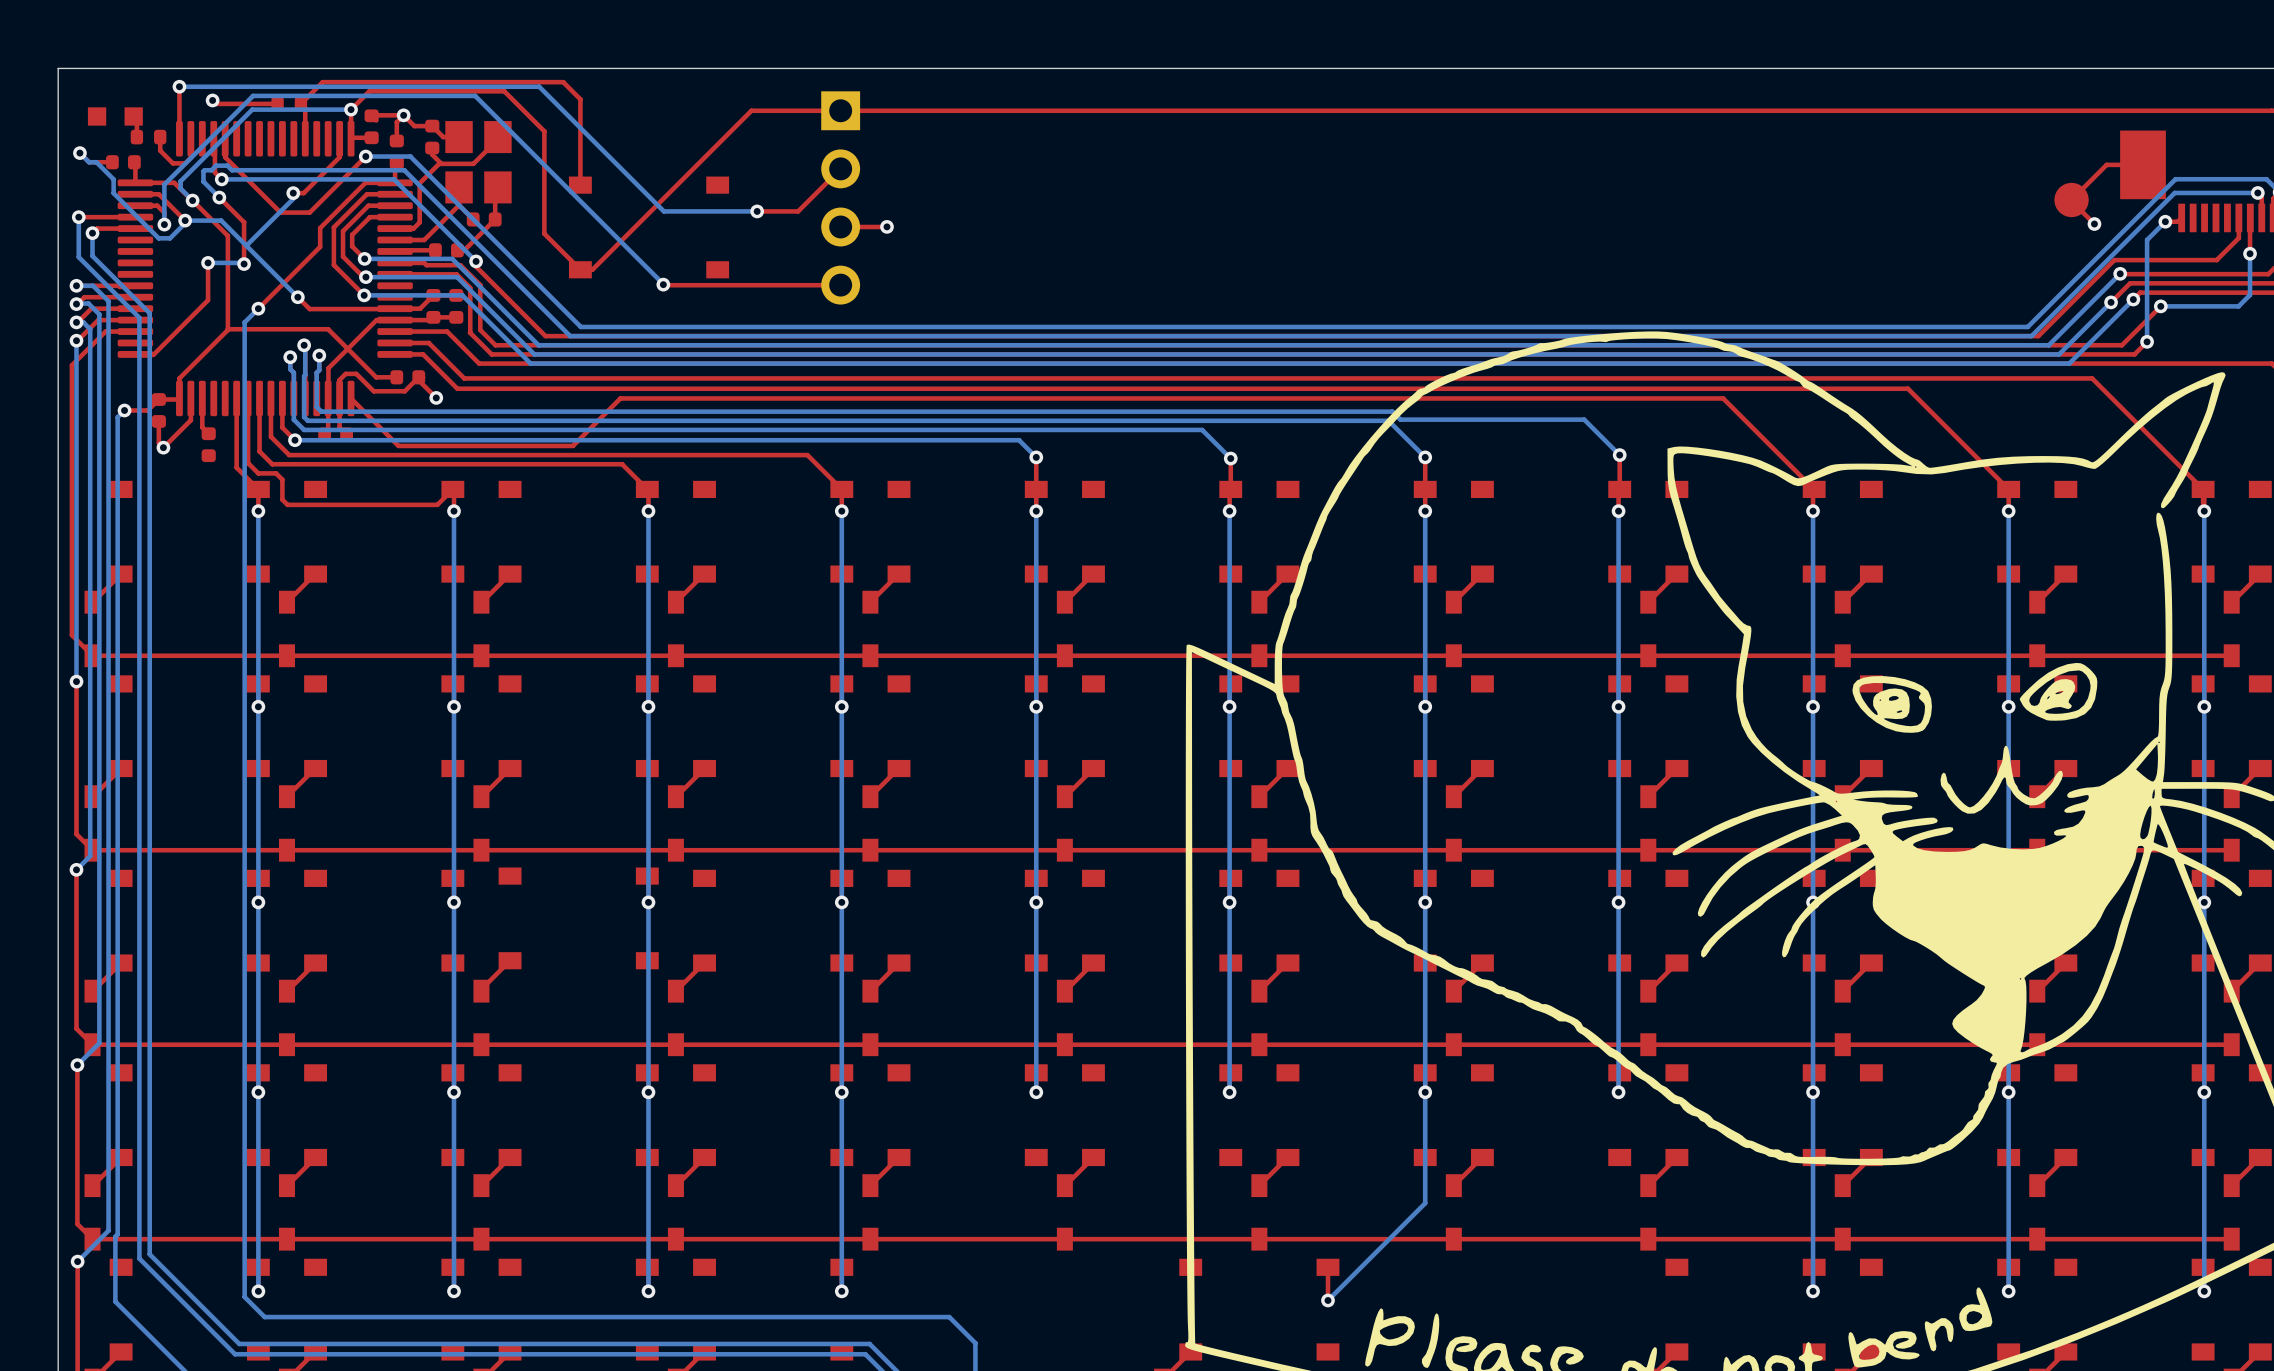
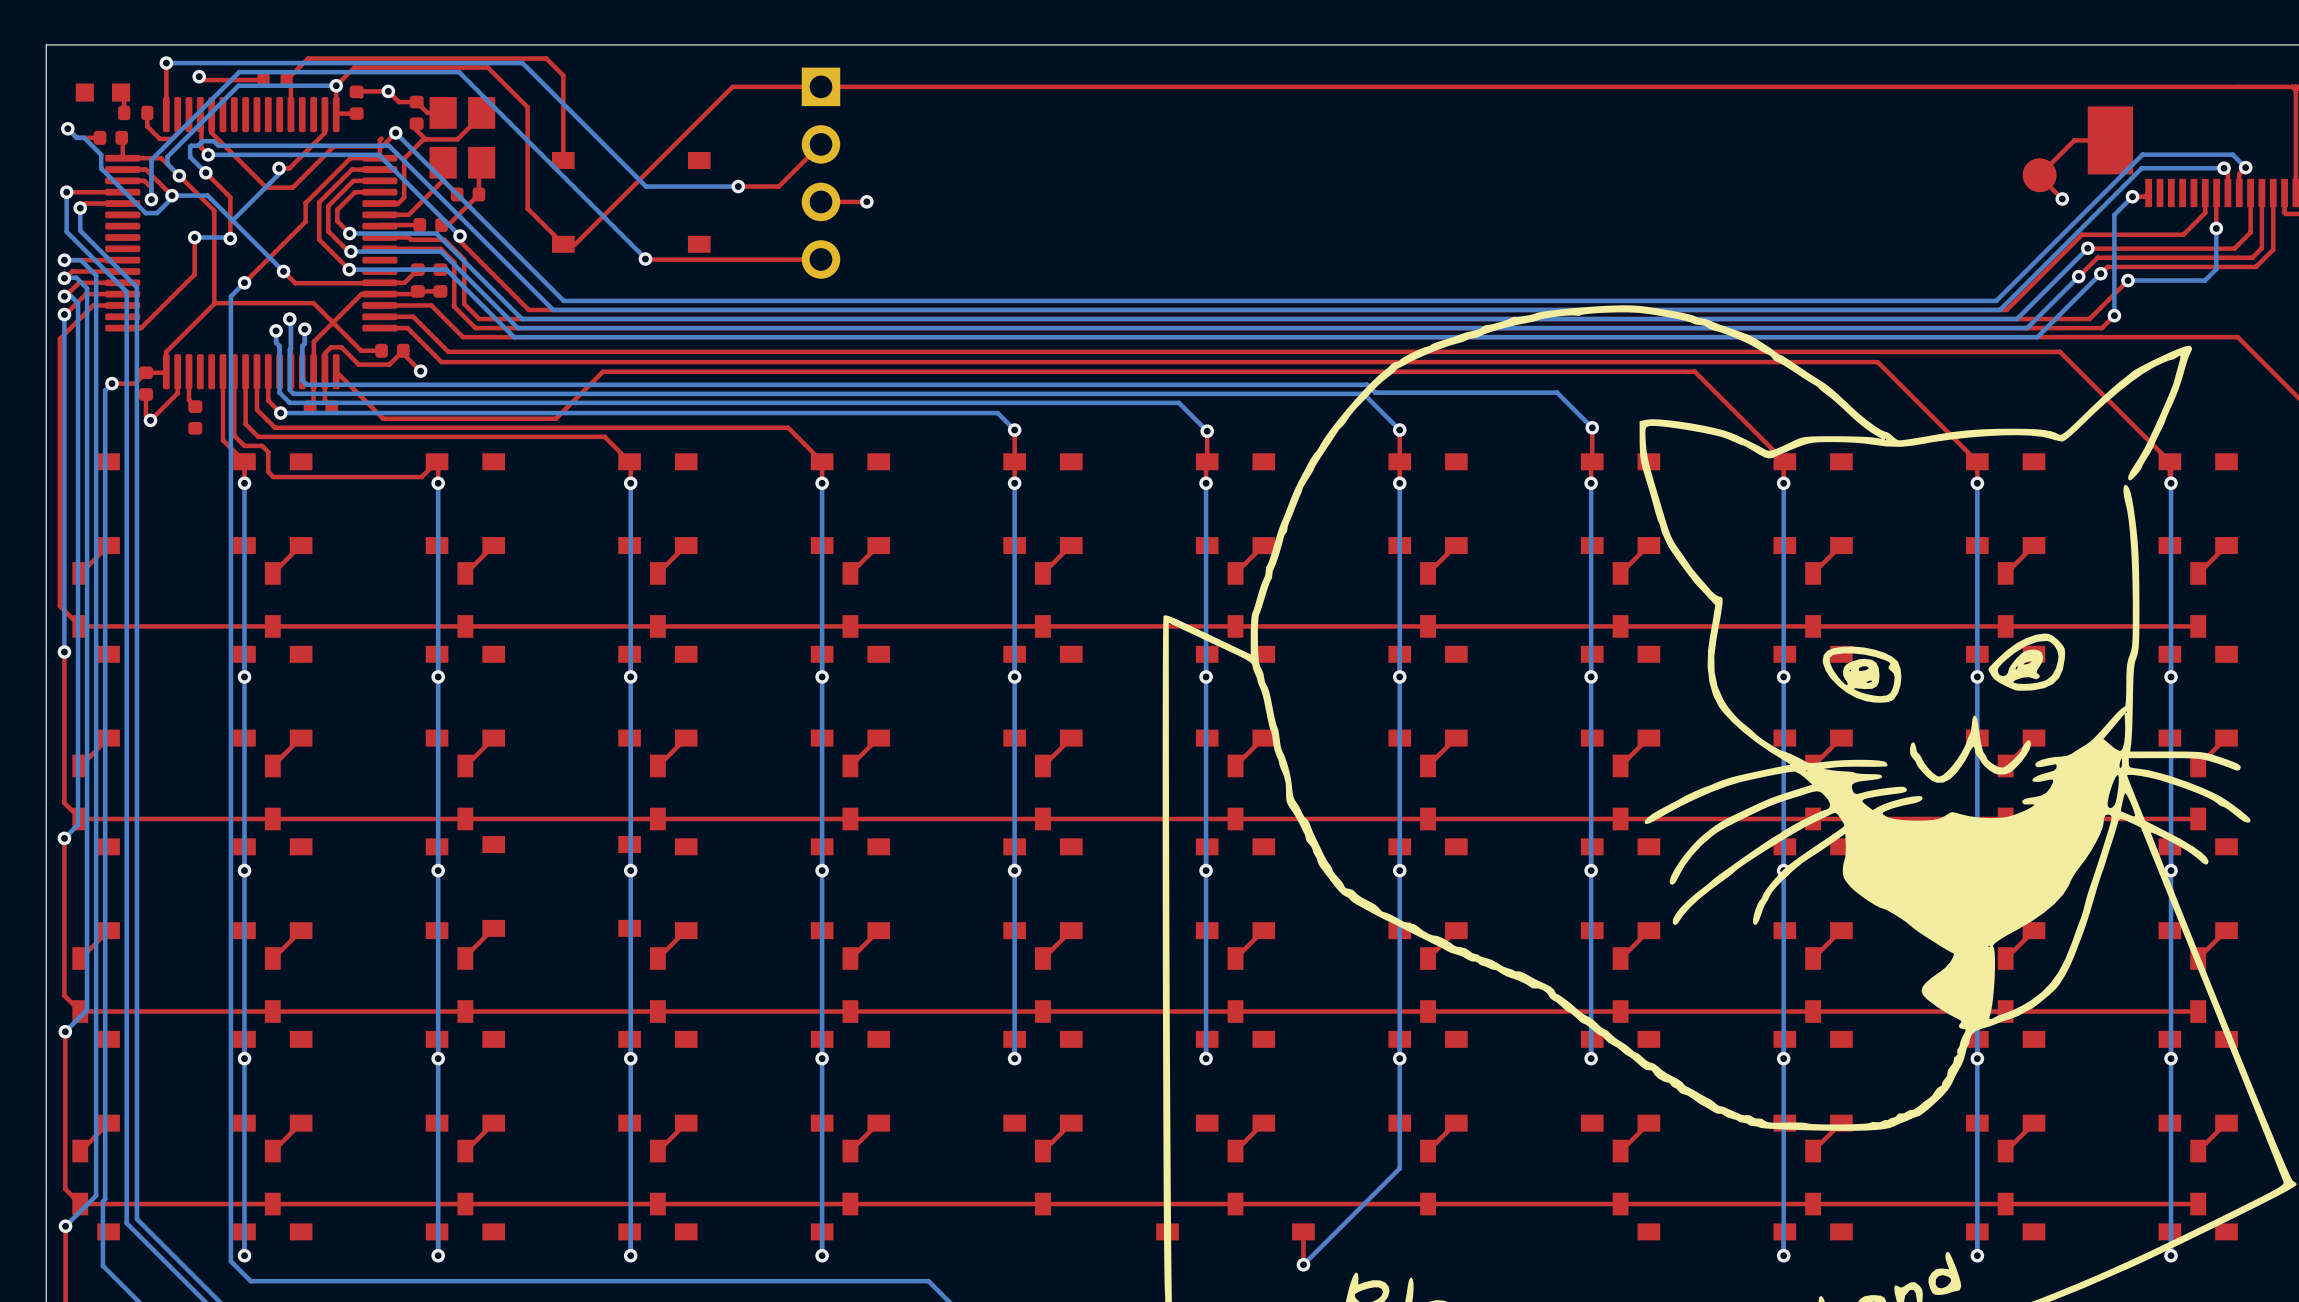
top track: (403, 115) (396, 122) (396, 140) -> none
part: (396, 151) -> none
top track: (365, 156) (309, 212) (307, 212) -> (395, 132) (382, 146) (333, 146) (292, 187)
bottom track: (365, 156) (411, 157) -> none
via position: (365, 156) -> (395, 132)

